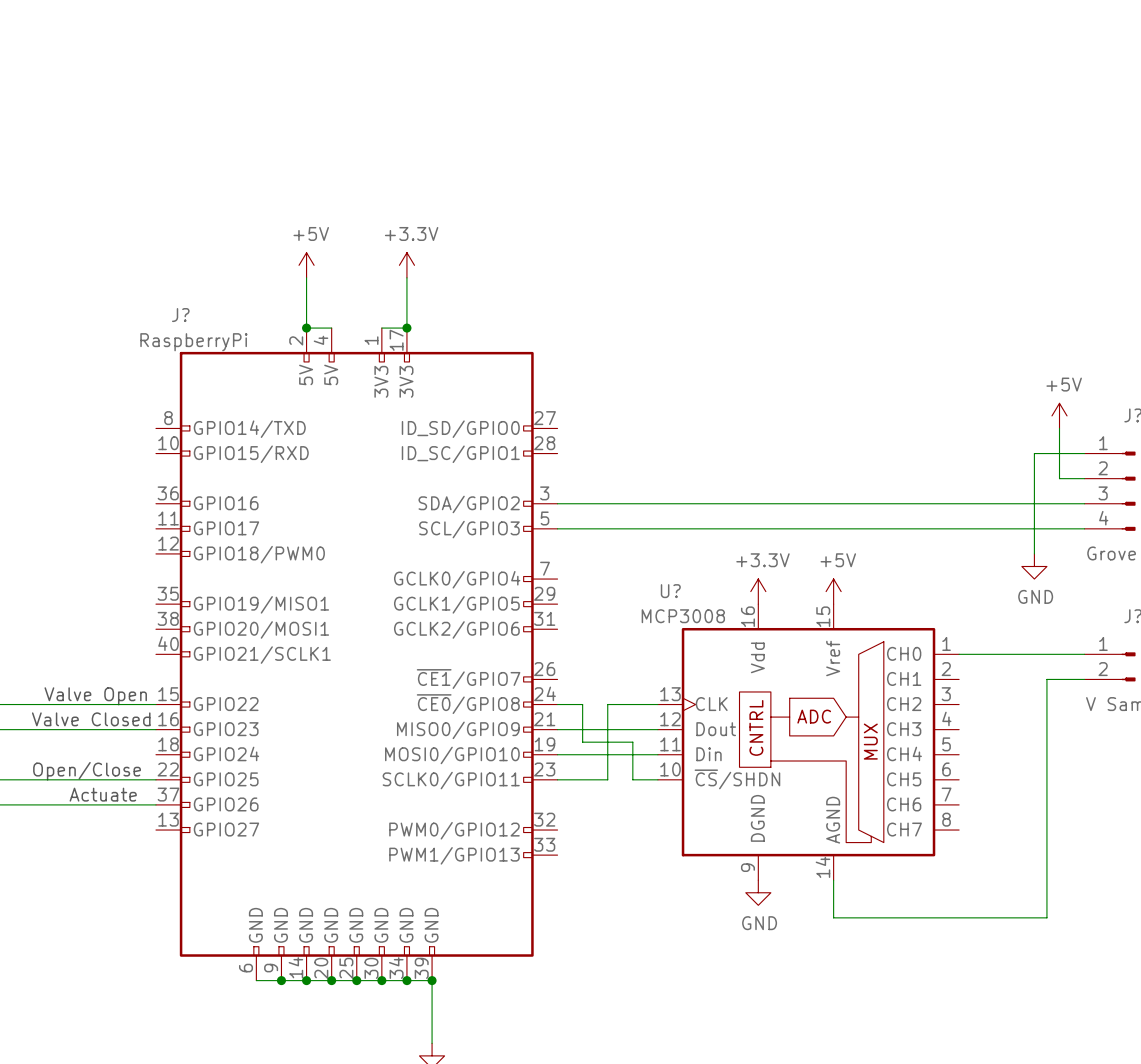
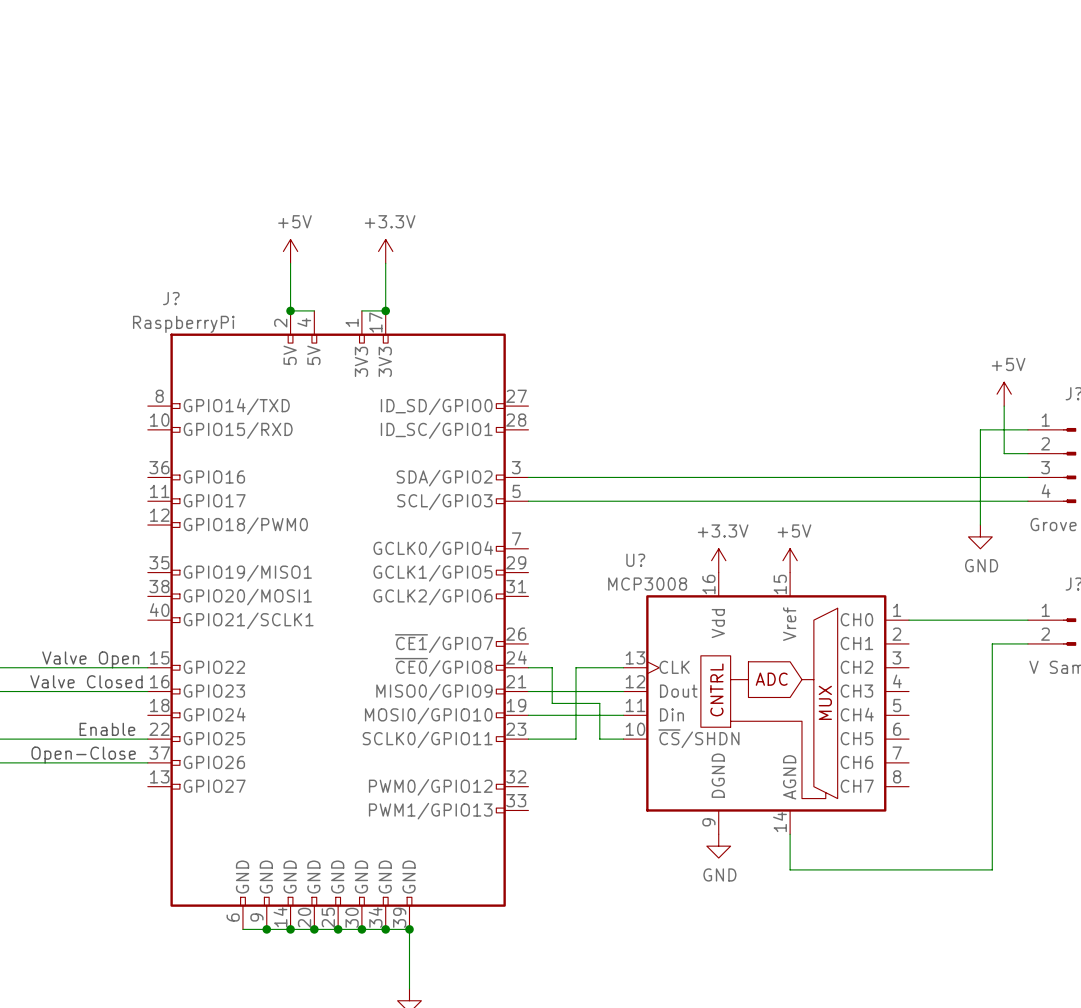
text: none -> Enable (107, 729)
text: Open/Close (87, 771) -> Open-Close (83, 755)
text: Actuate (103, 794) -> none

